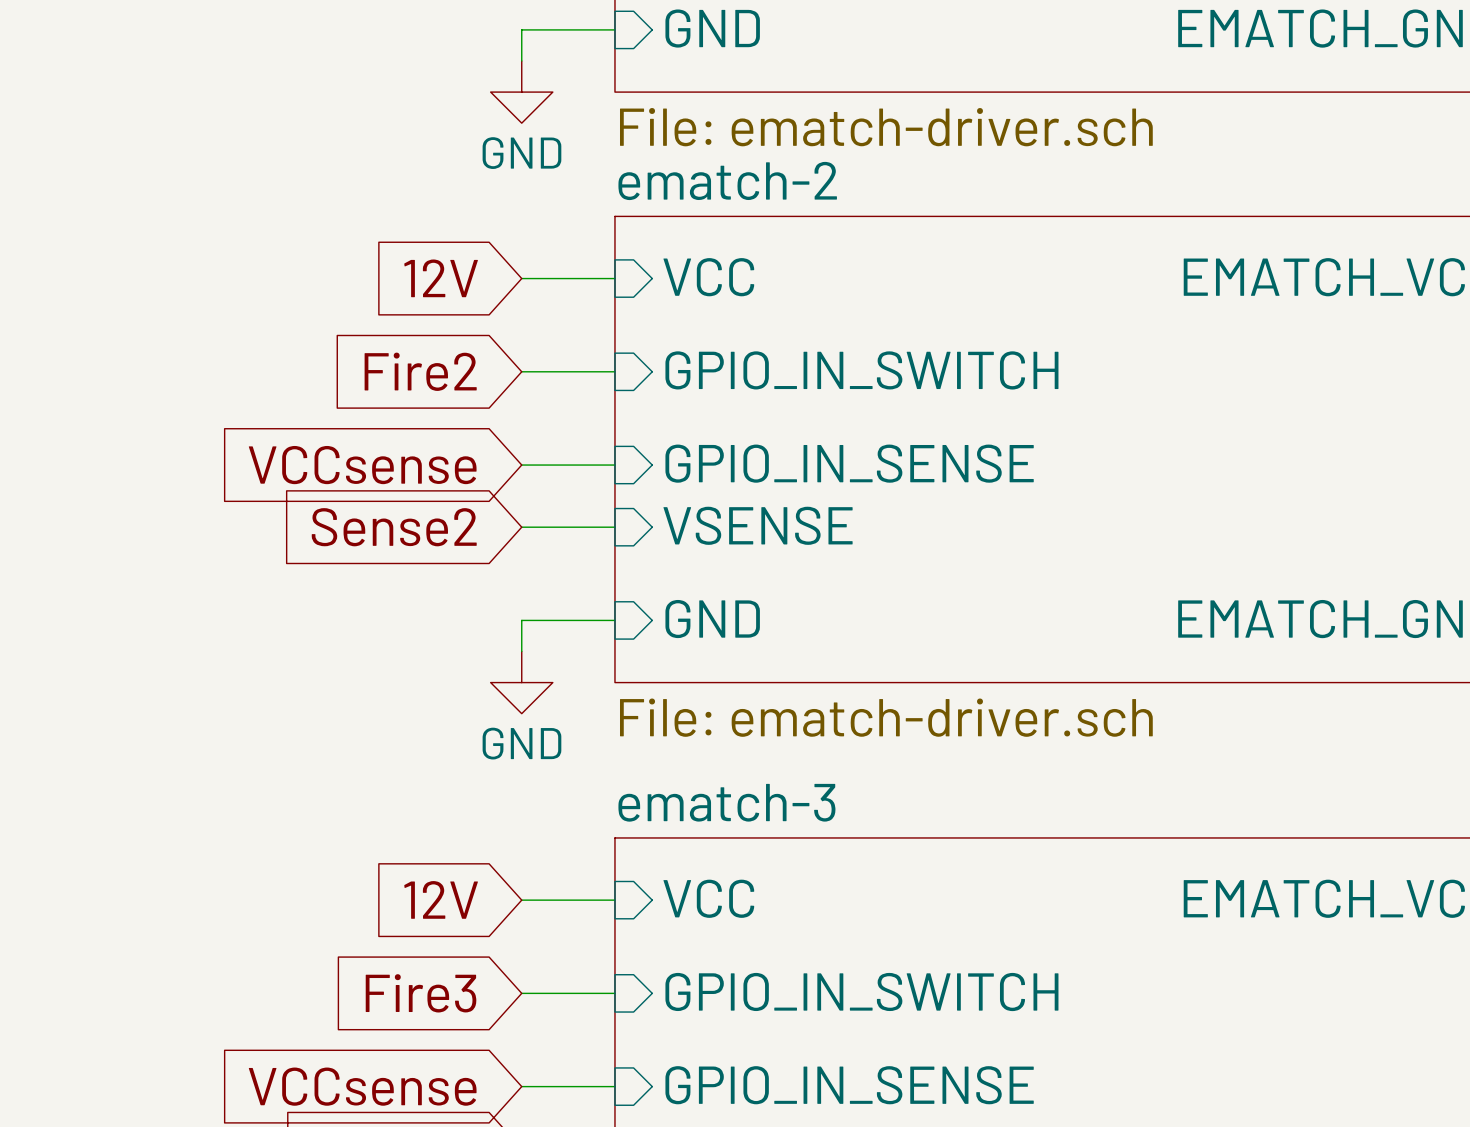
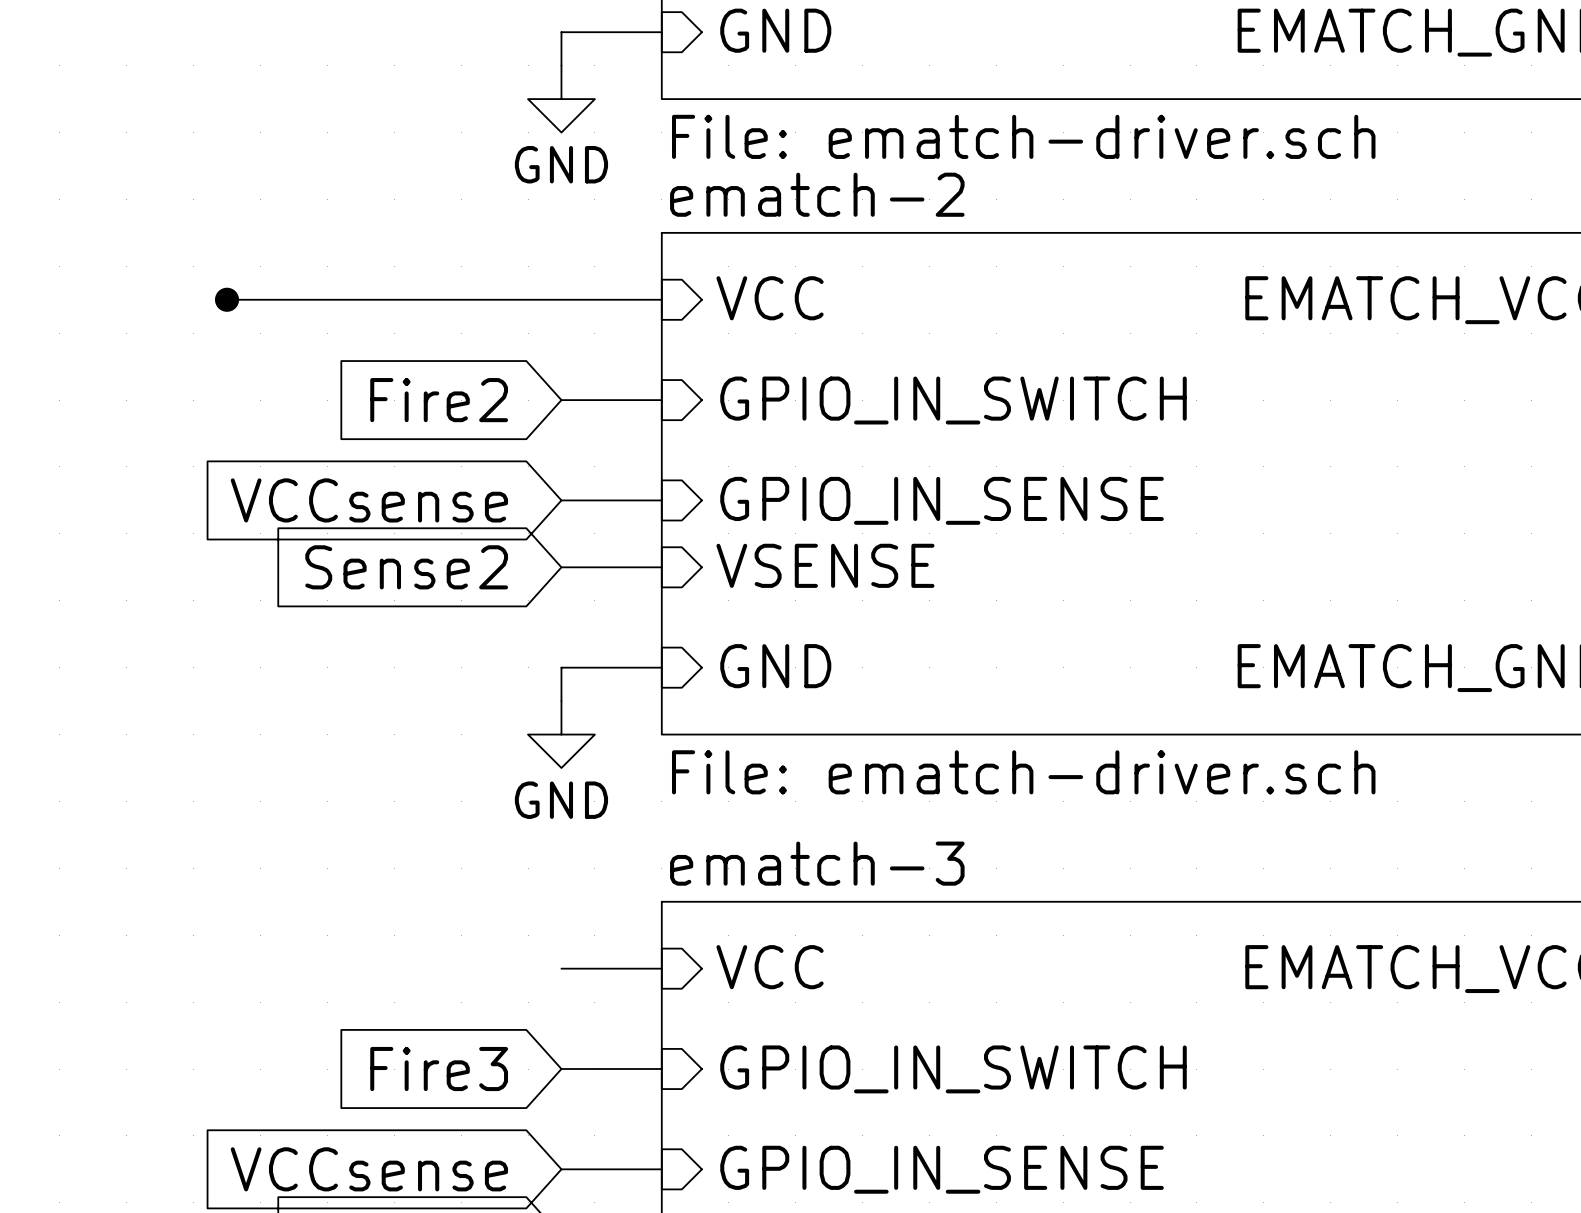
wire: none -> (227, 299) (561, 299)
junction: none -> (227, 299)
global label: 12V (441, 278) -> none
global label: 12V (441, 899) -> none

